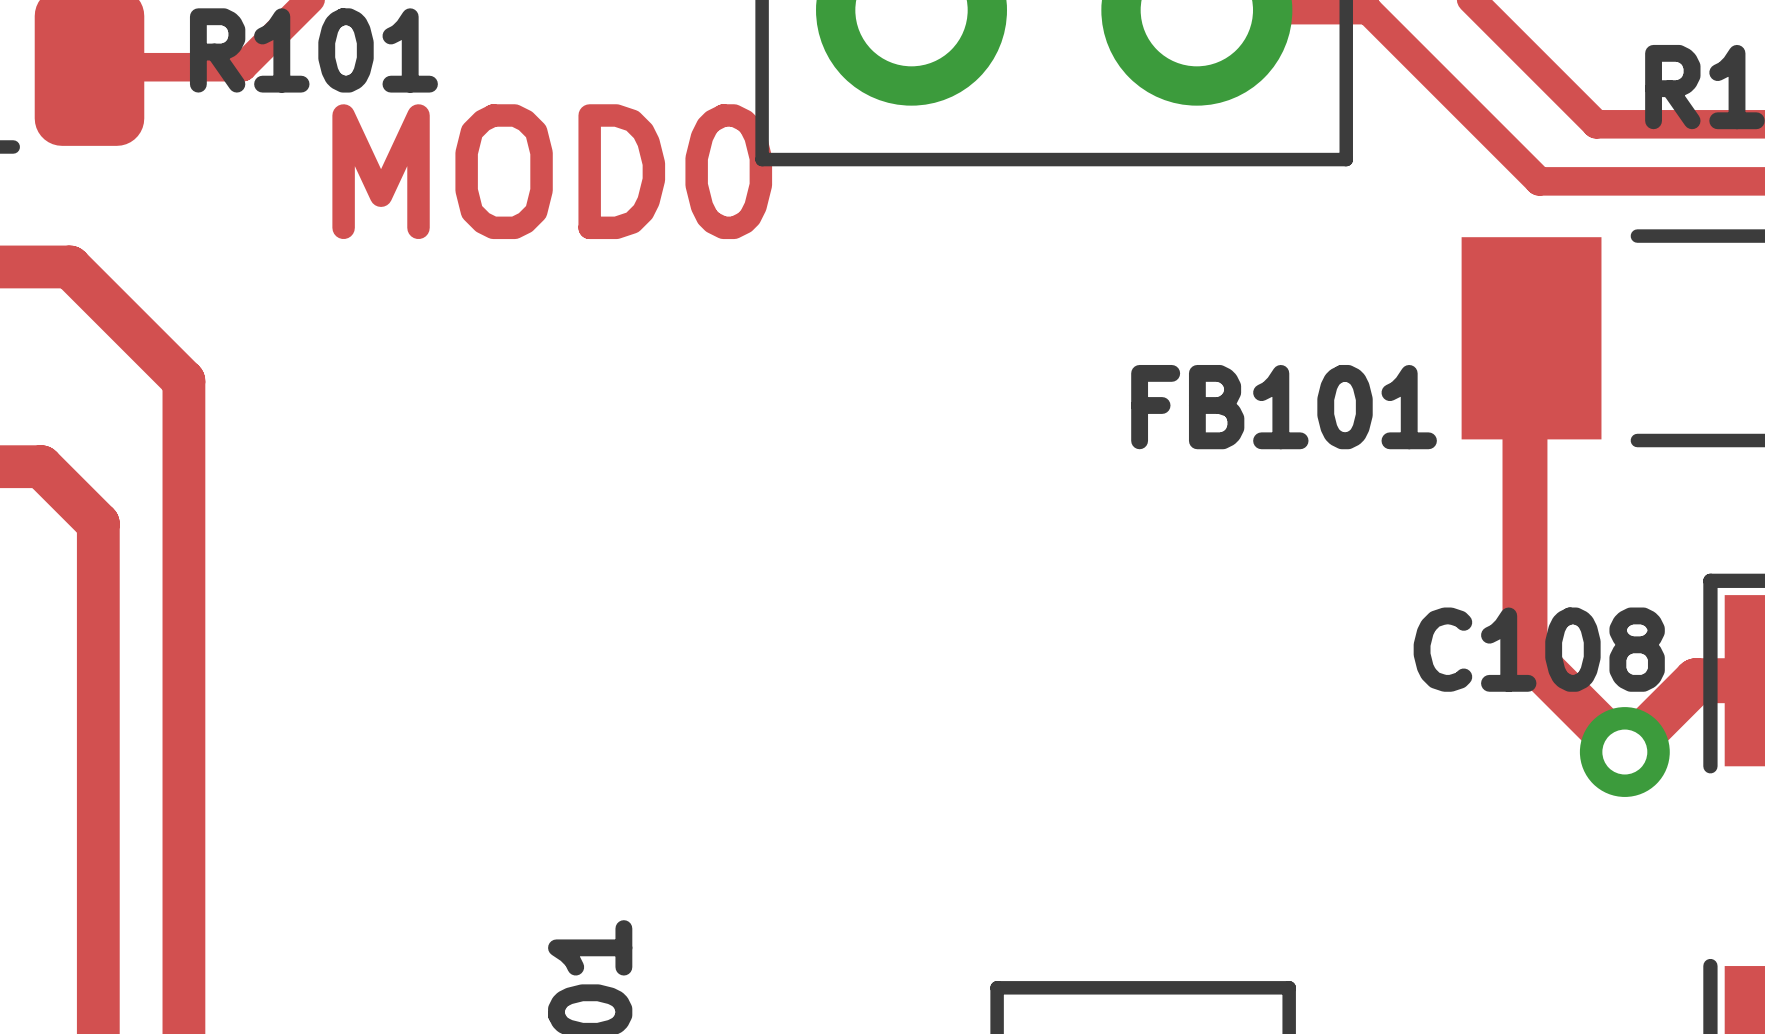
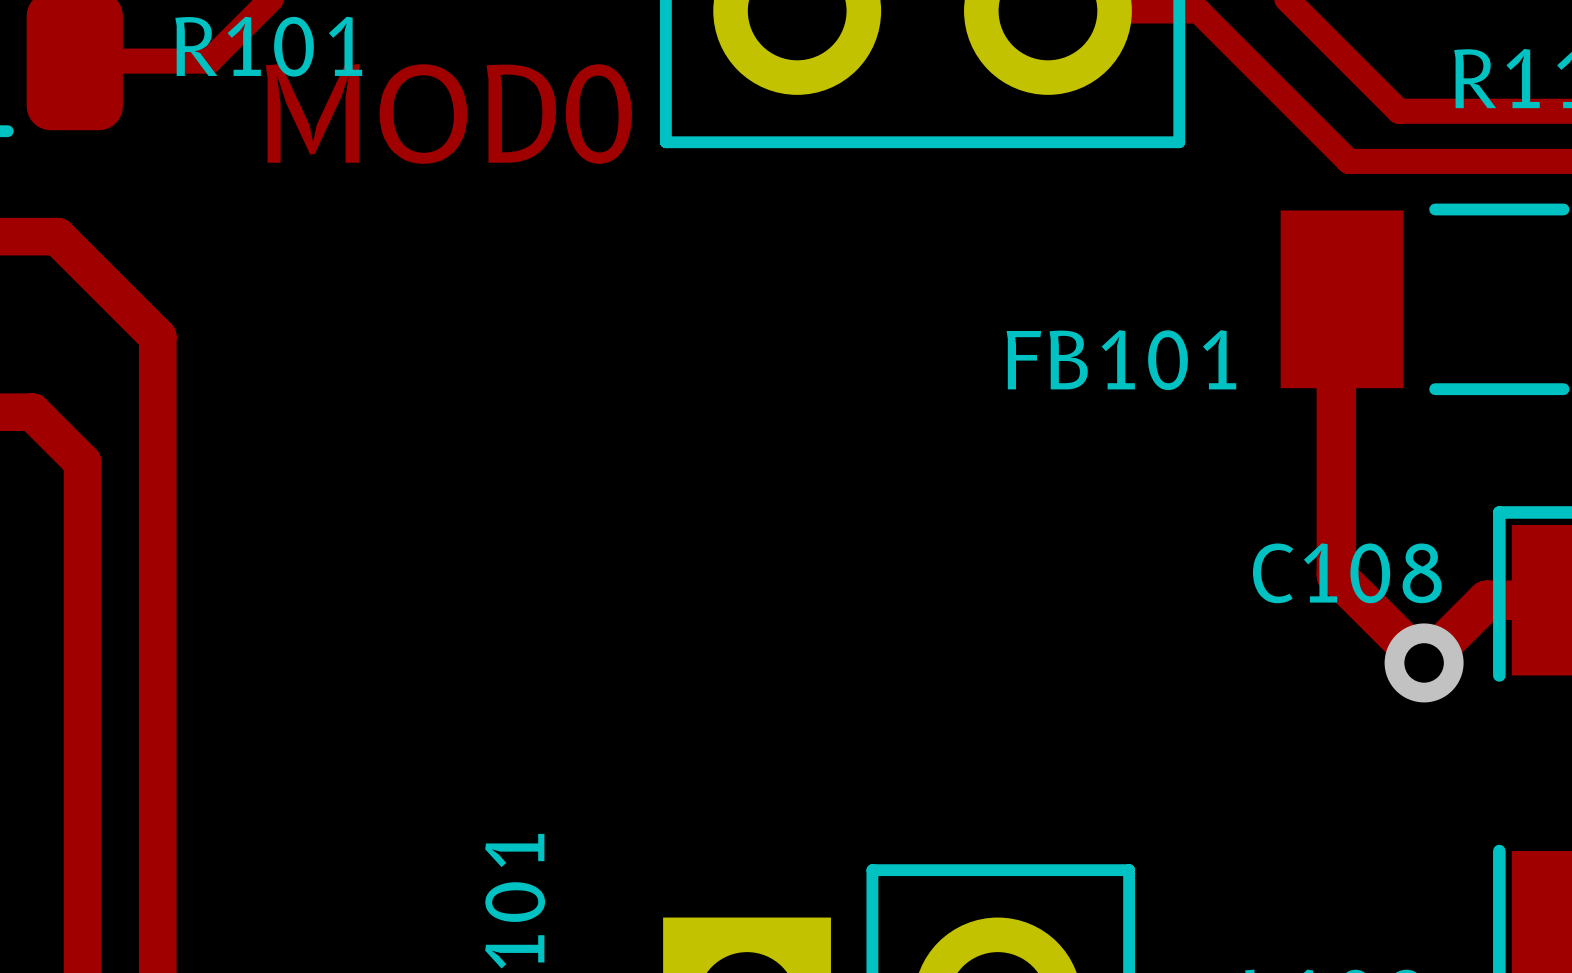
text position: MOD0 (552, 171) -> MOD0 (448, 113)

